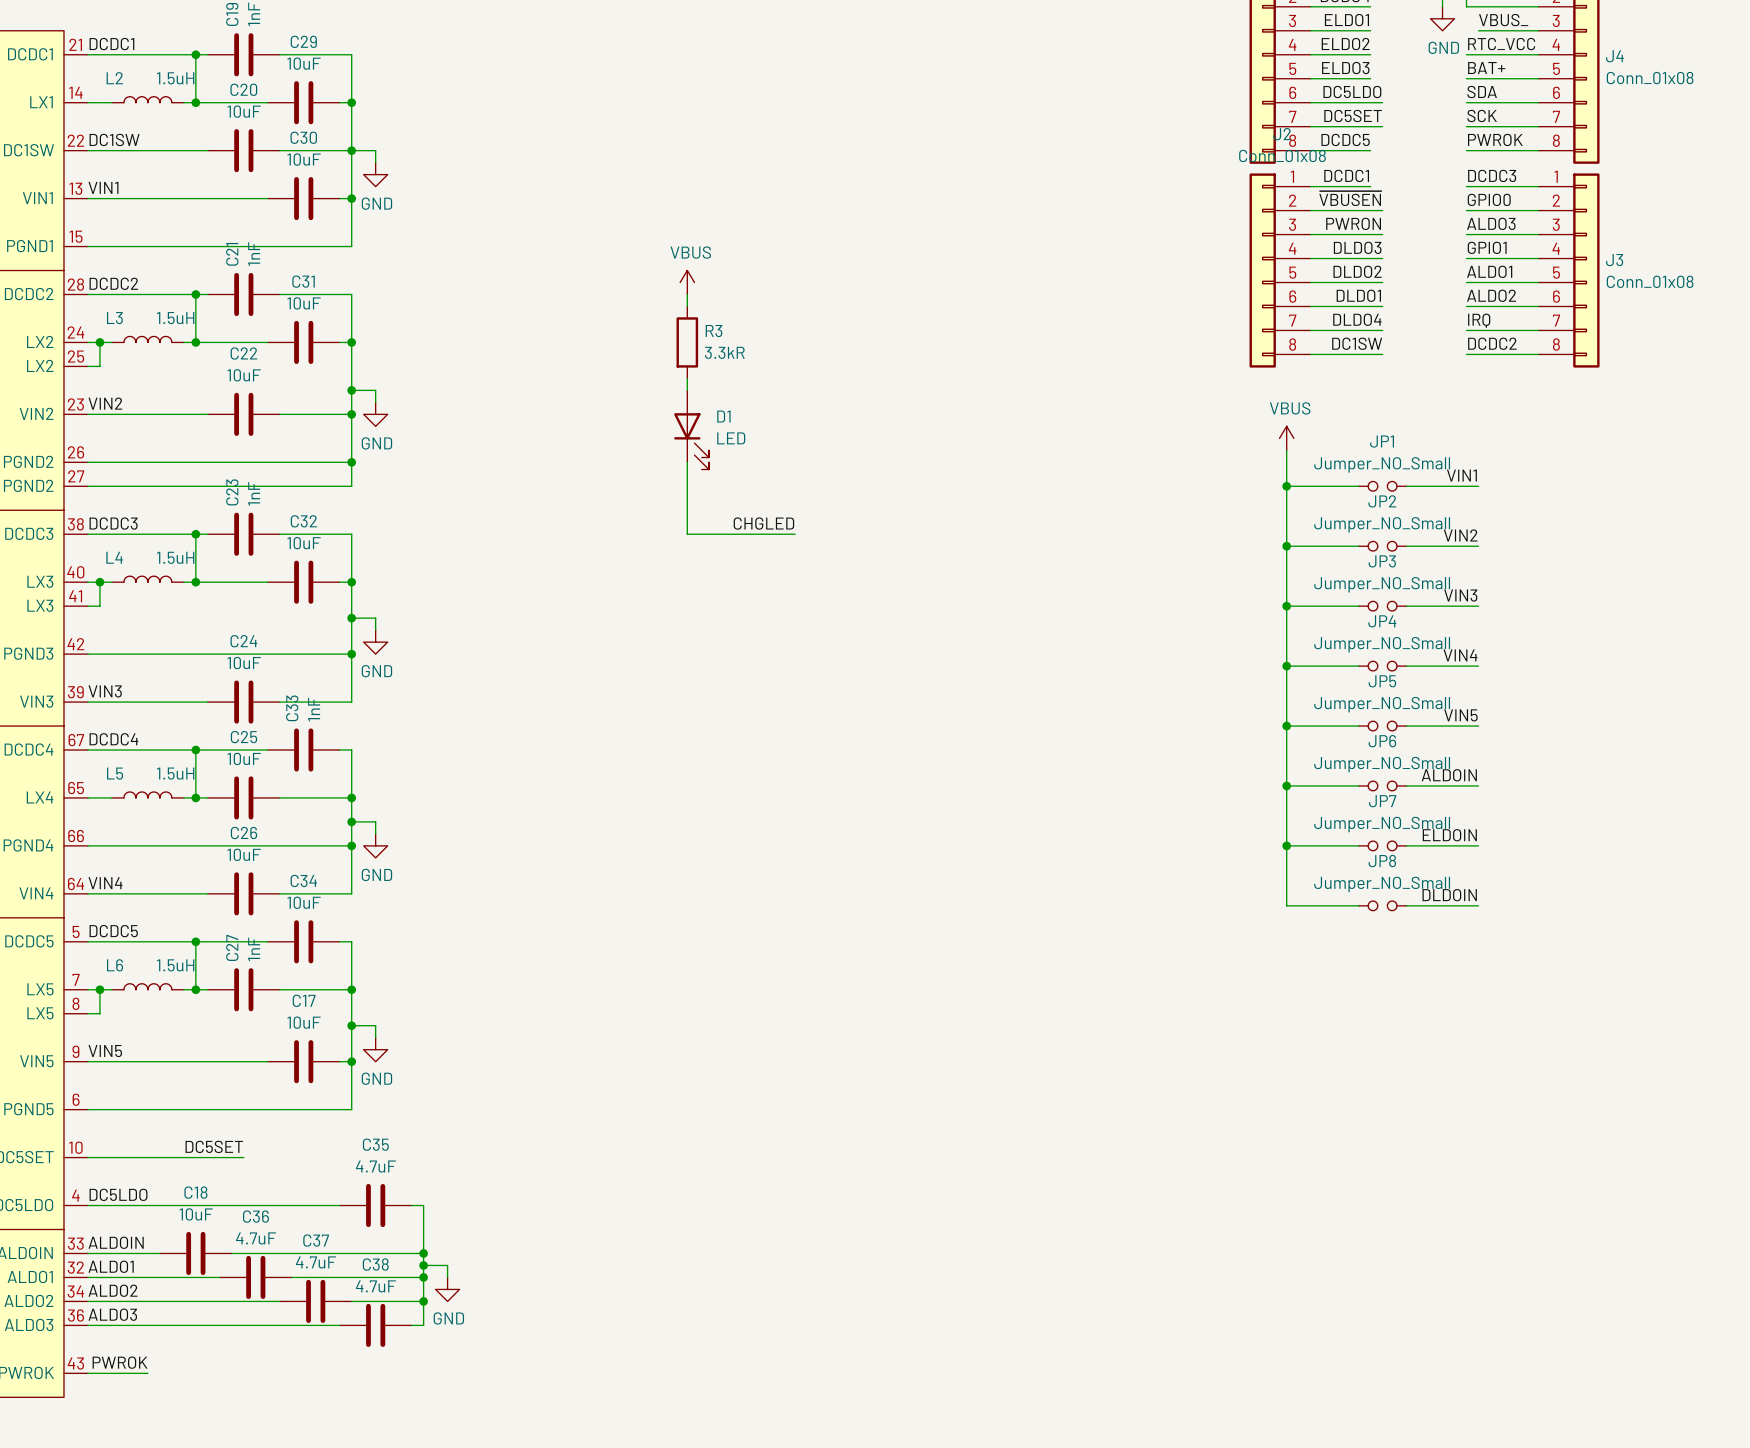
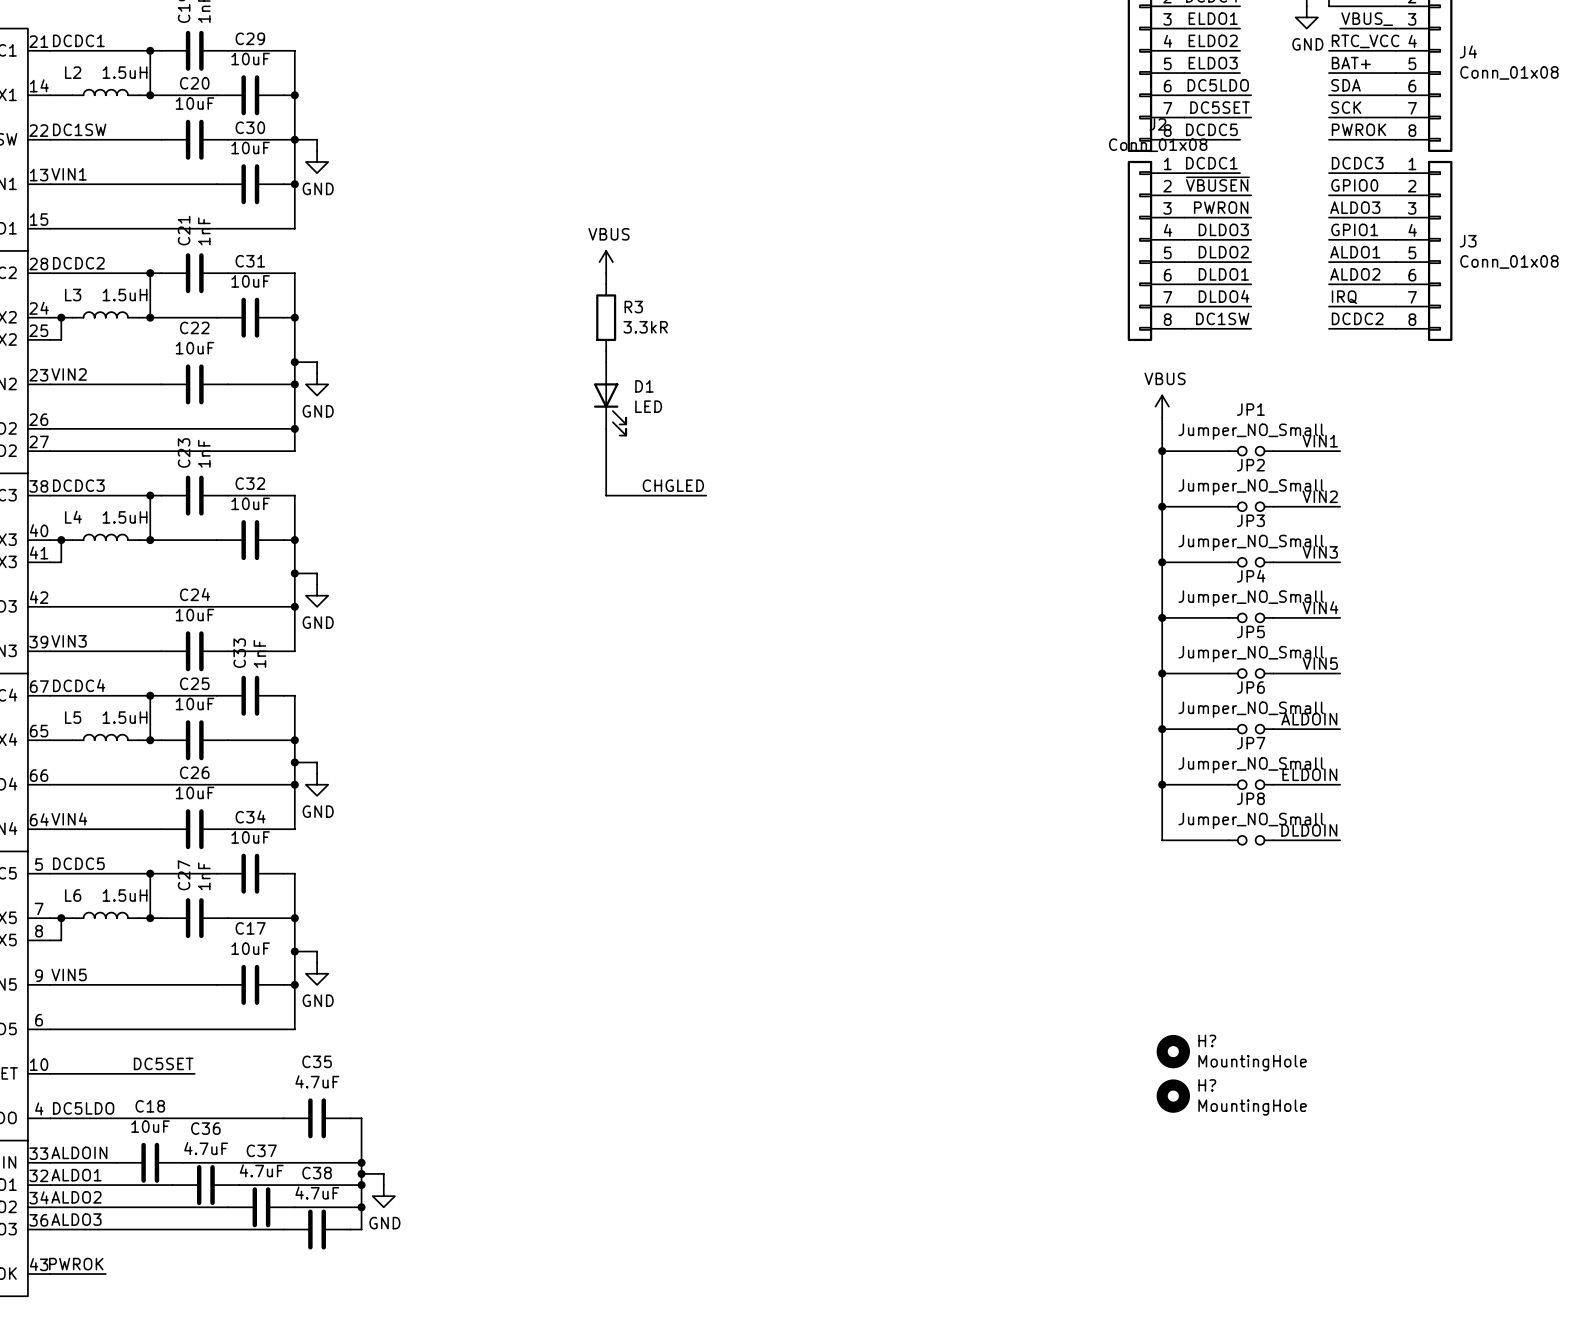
H?: none -> MountingHole (1173, 1051)
H?: none -> MountingHole (1173, 1096)

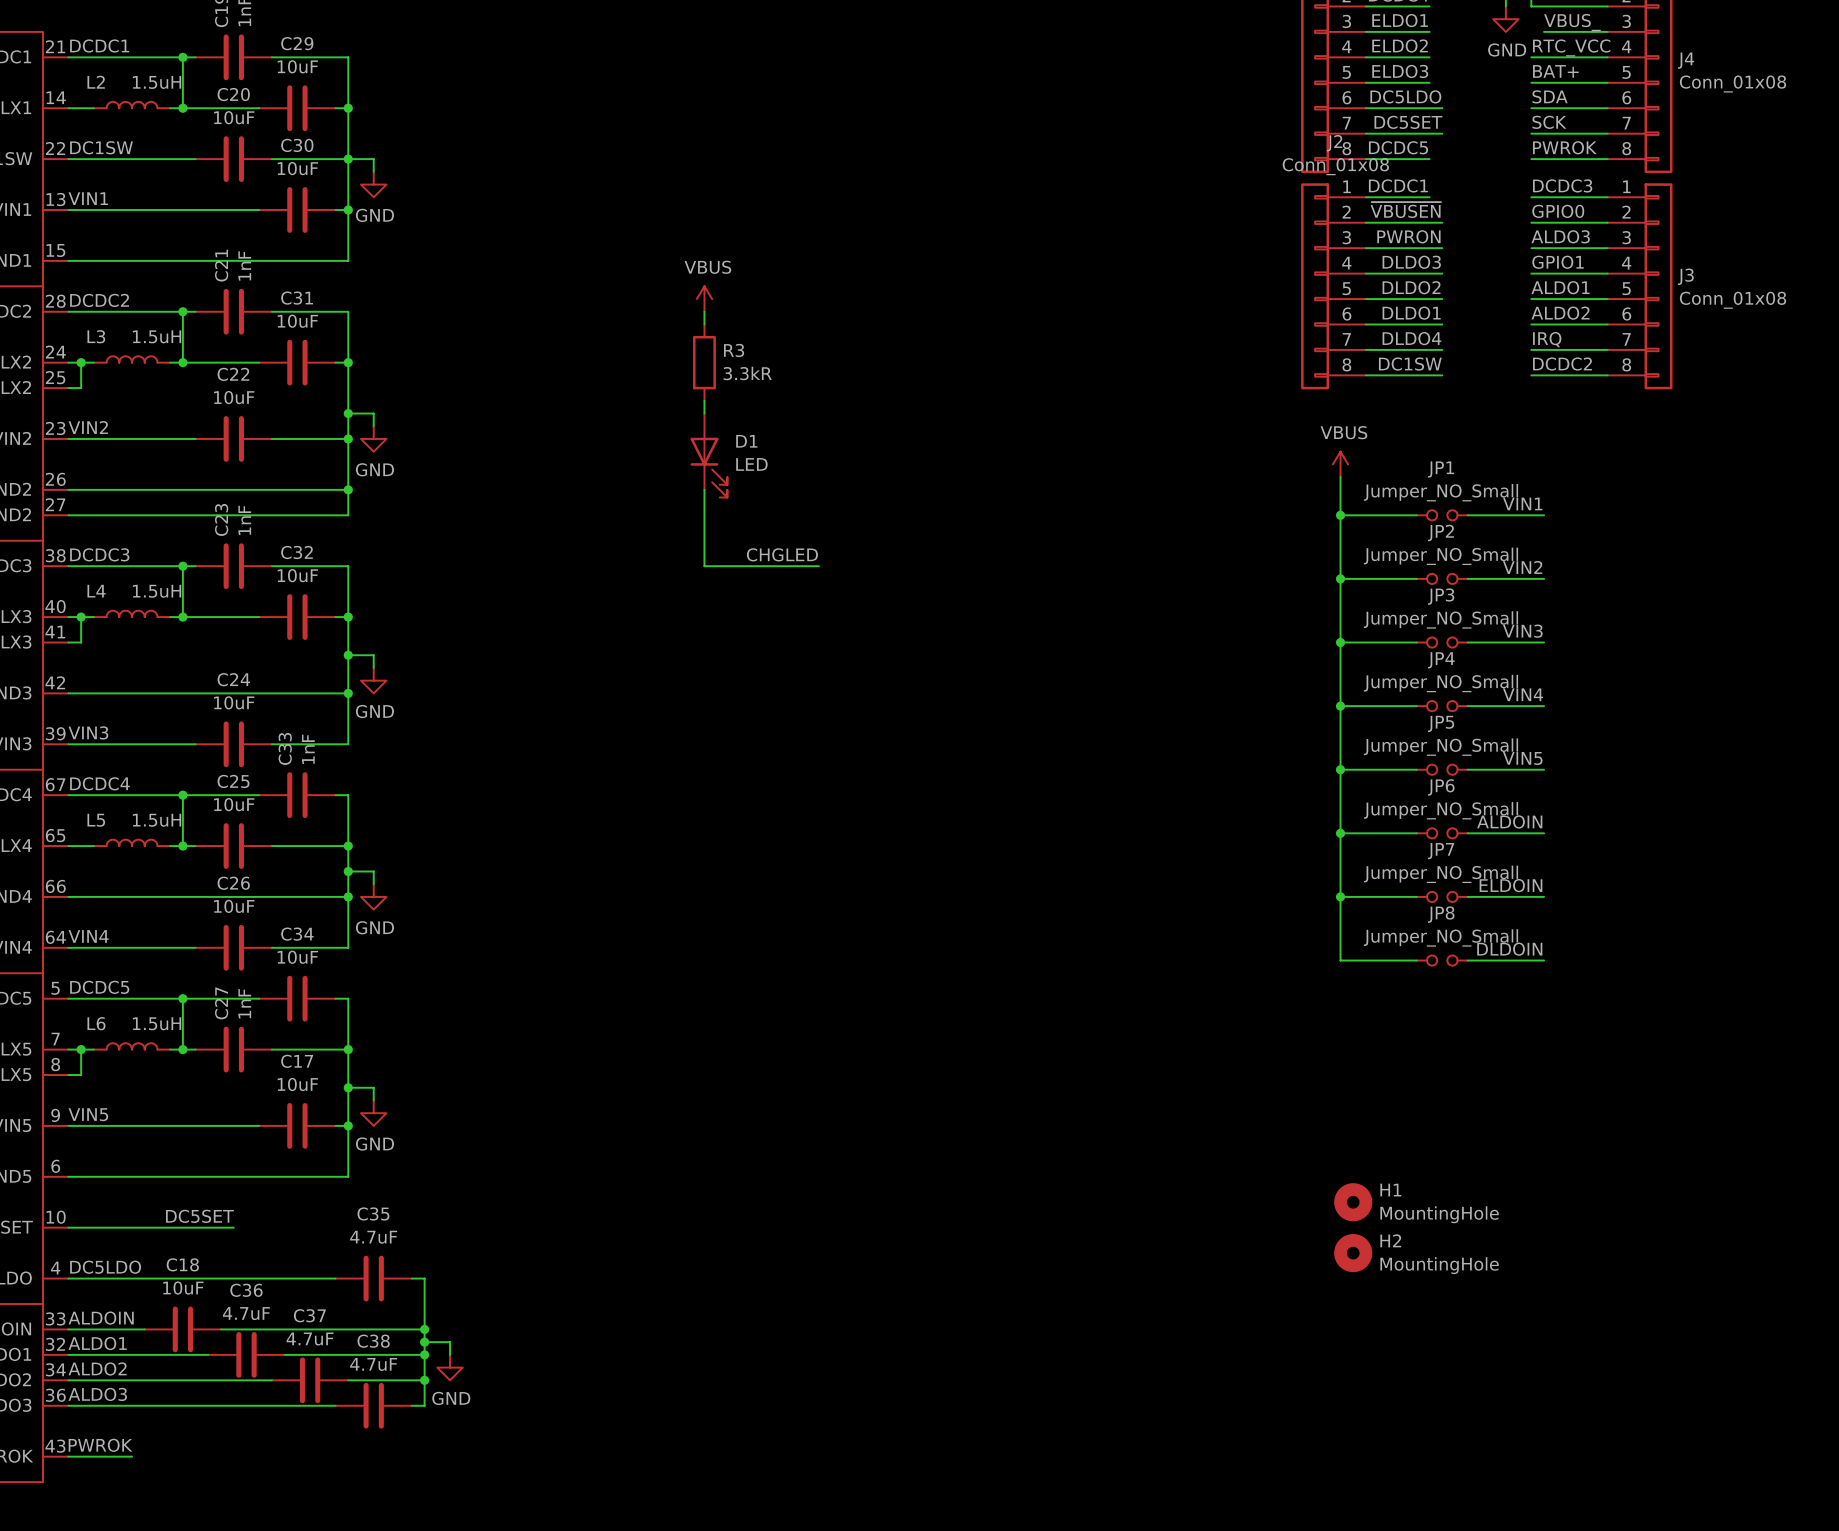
H? name: H? (1207, 1040) -> H1 (1390, 1190)
H? name: H? (1207, 1085) -> H2 (1390, 1240)

